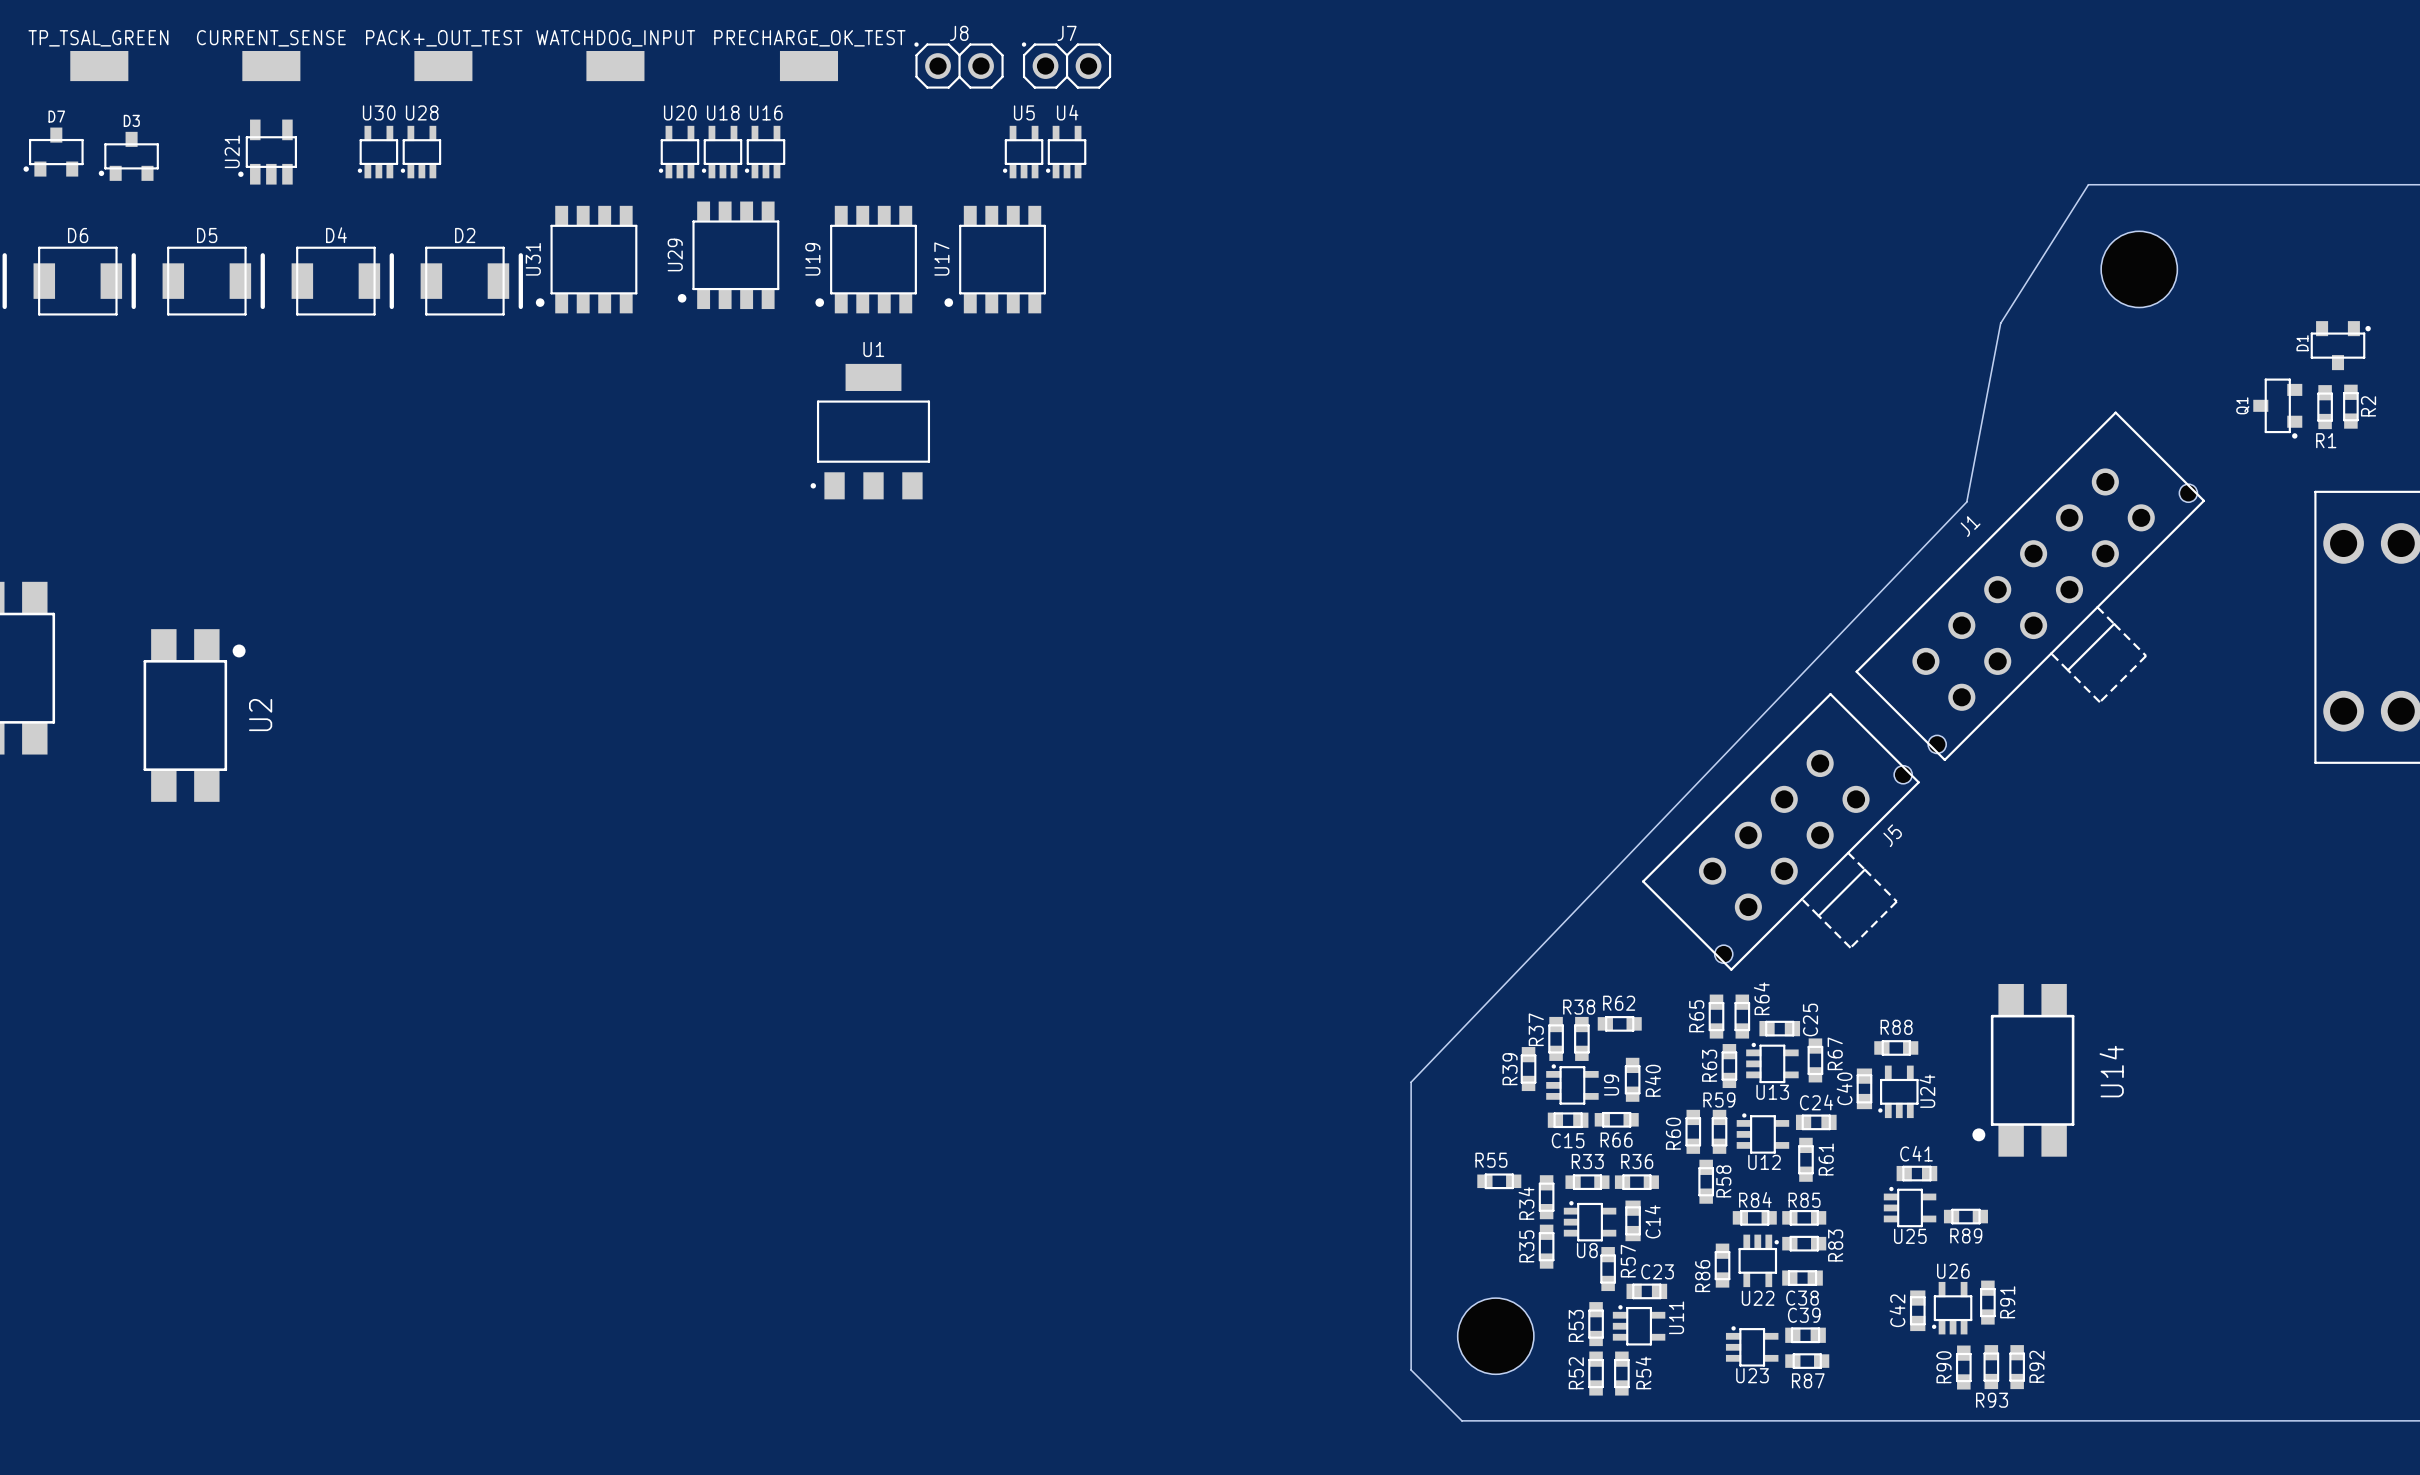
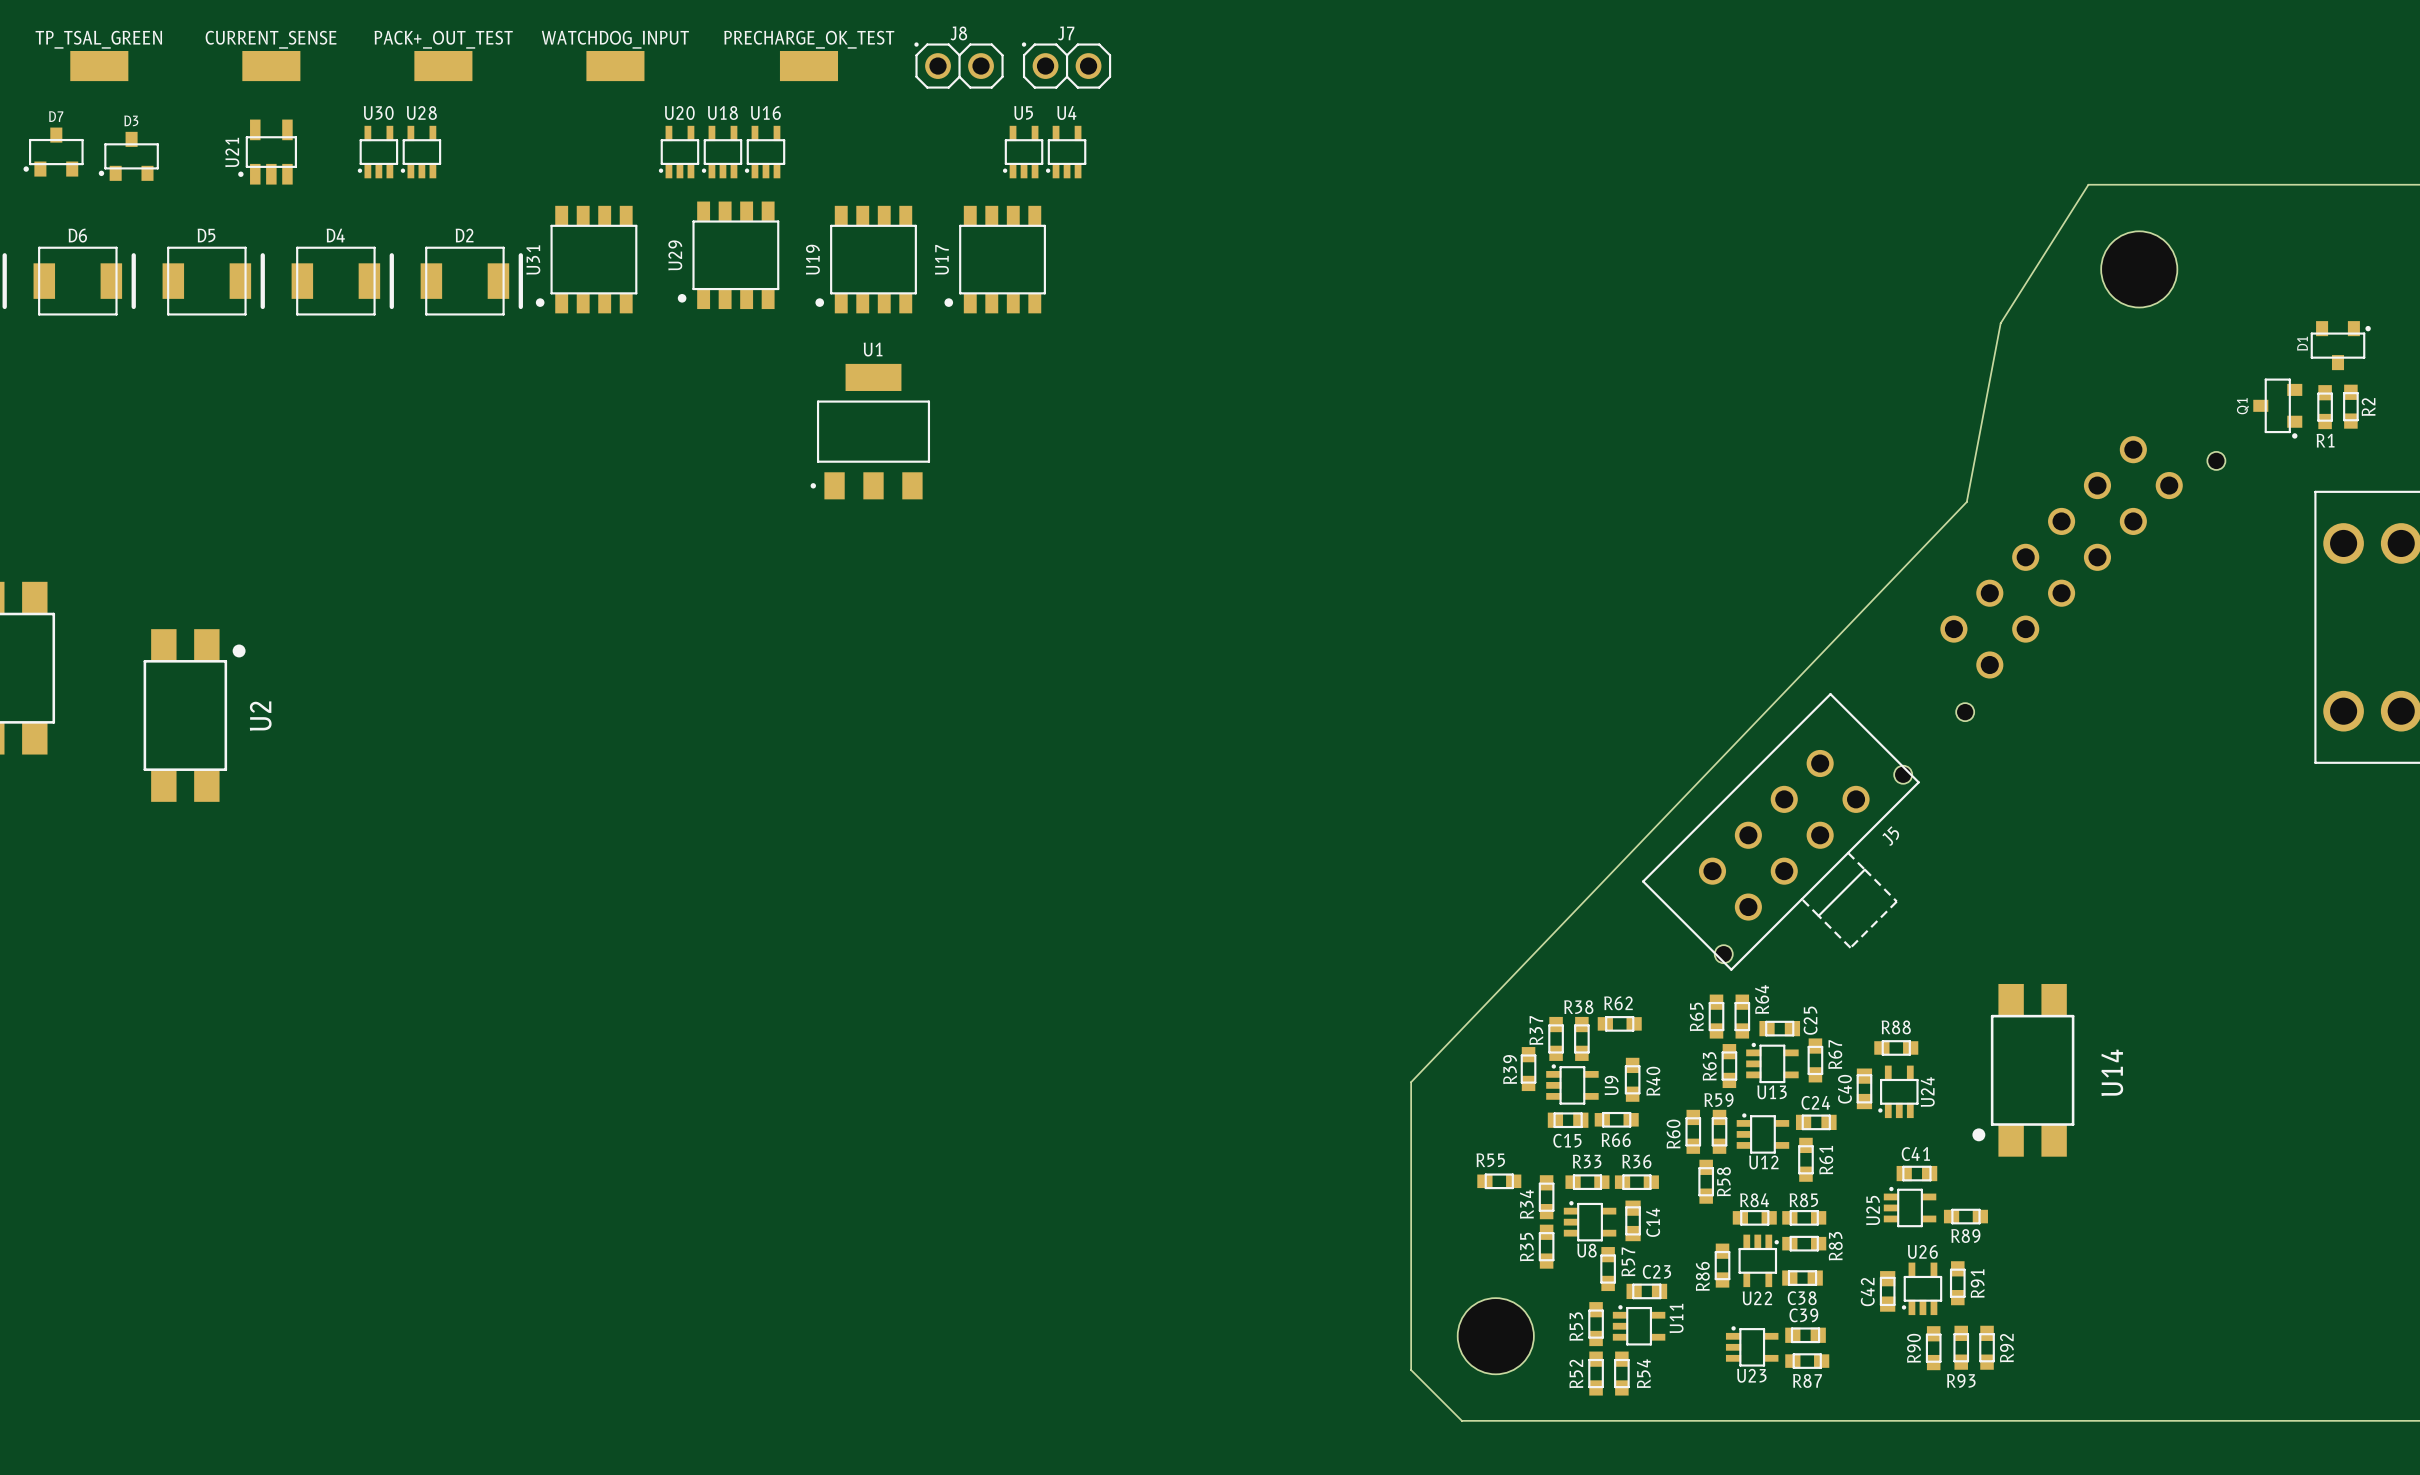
J1 side: top (2030, 586) -> bottom (2082, 578)
U25 name rotation: 0° (1910, 1236) -> 90° counterclockwise (1873, 1210)
U25 name position: U25 (1910, 1236) -> U25 (1873, 1210)
R91 position: (1987, 1302) -> (1957, 1283)
U26 position: (1952, 1308) -> (1922, 1288)
C42 position: (1917, 1310) -> (1887, 1291)
R90 position: (1963, 1367) -> (1933, 1348)
R93 position: (1991, 1367) -> (1961, 1347)
R92 position: (2017, 1367) -> (1987, 1347)

